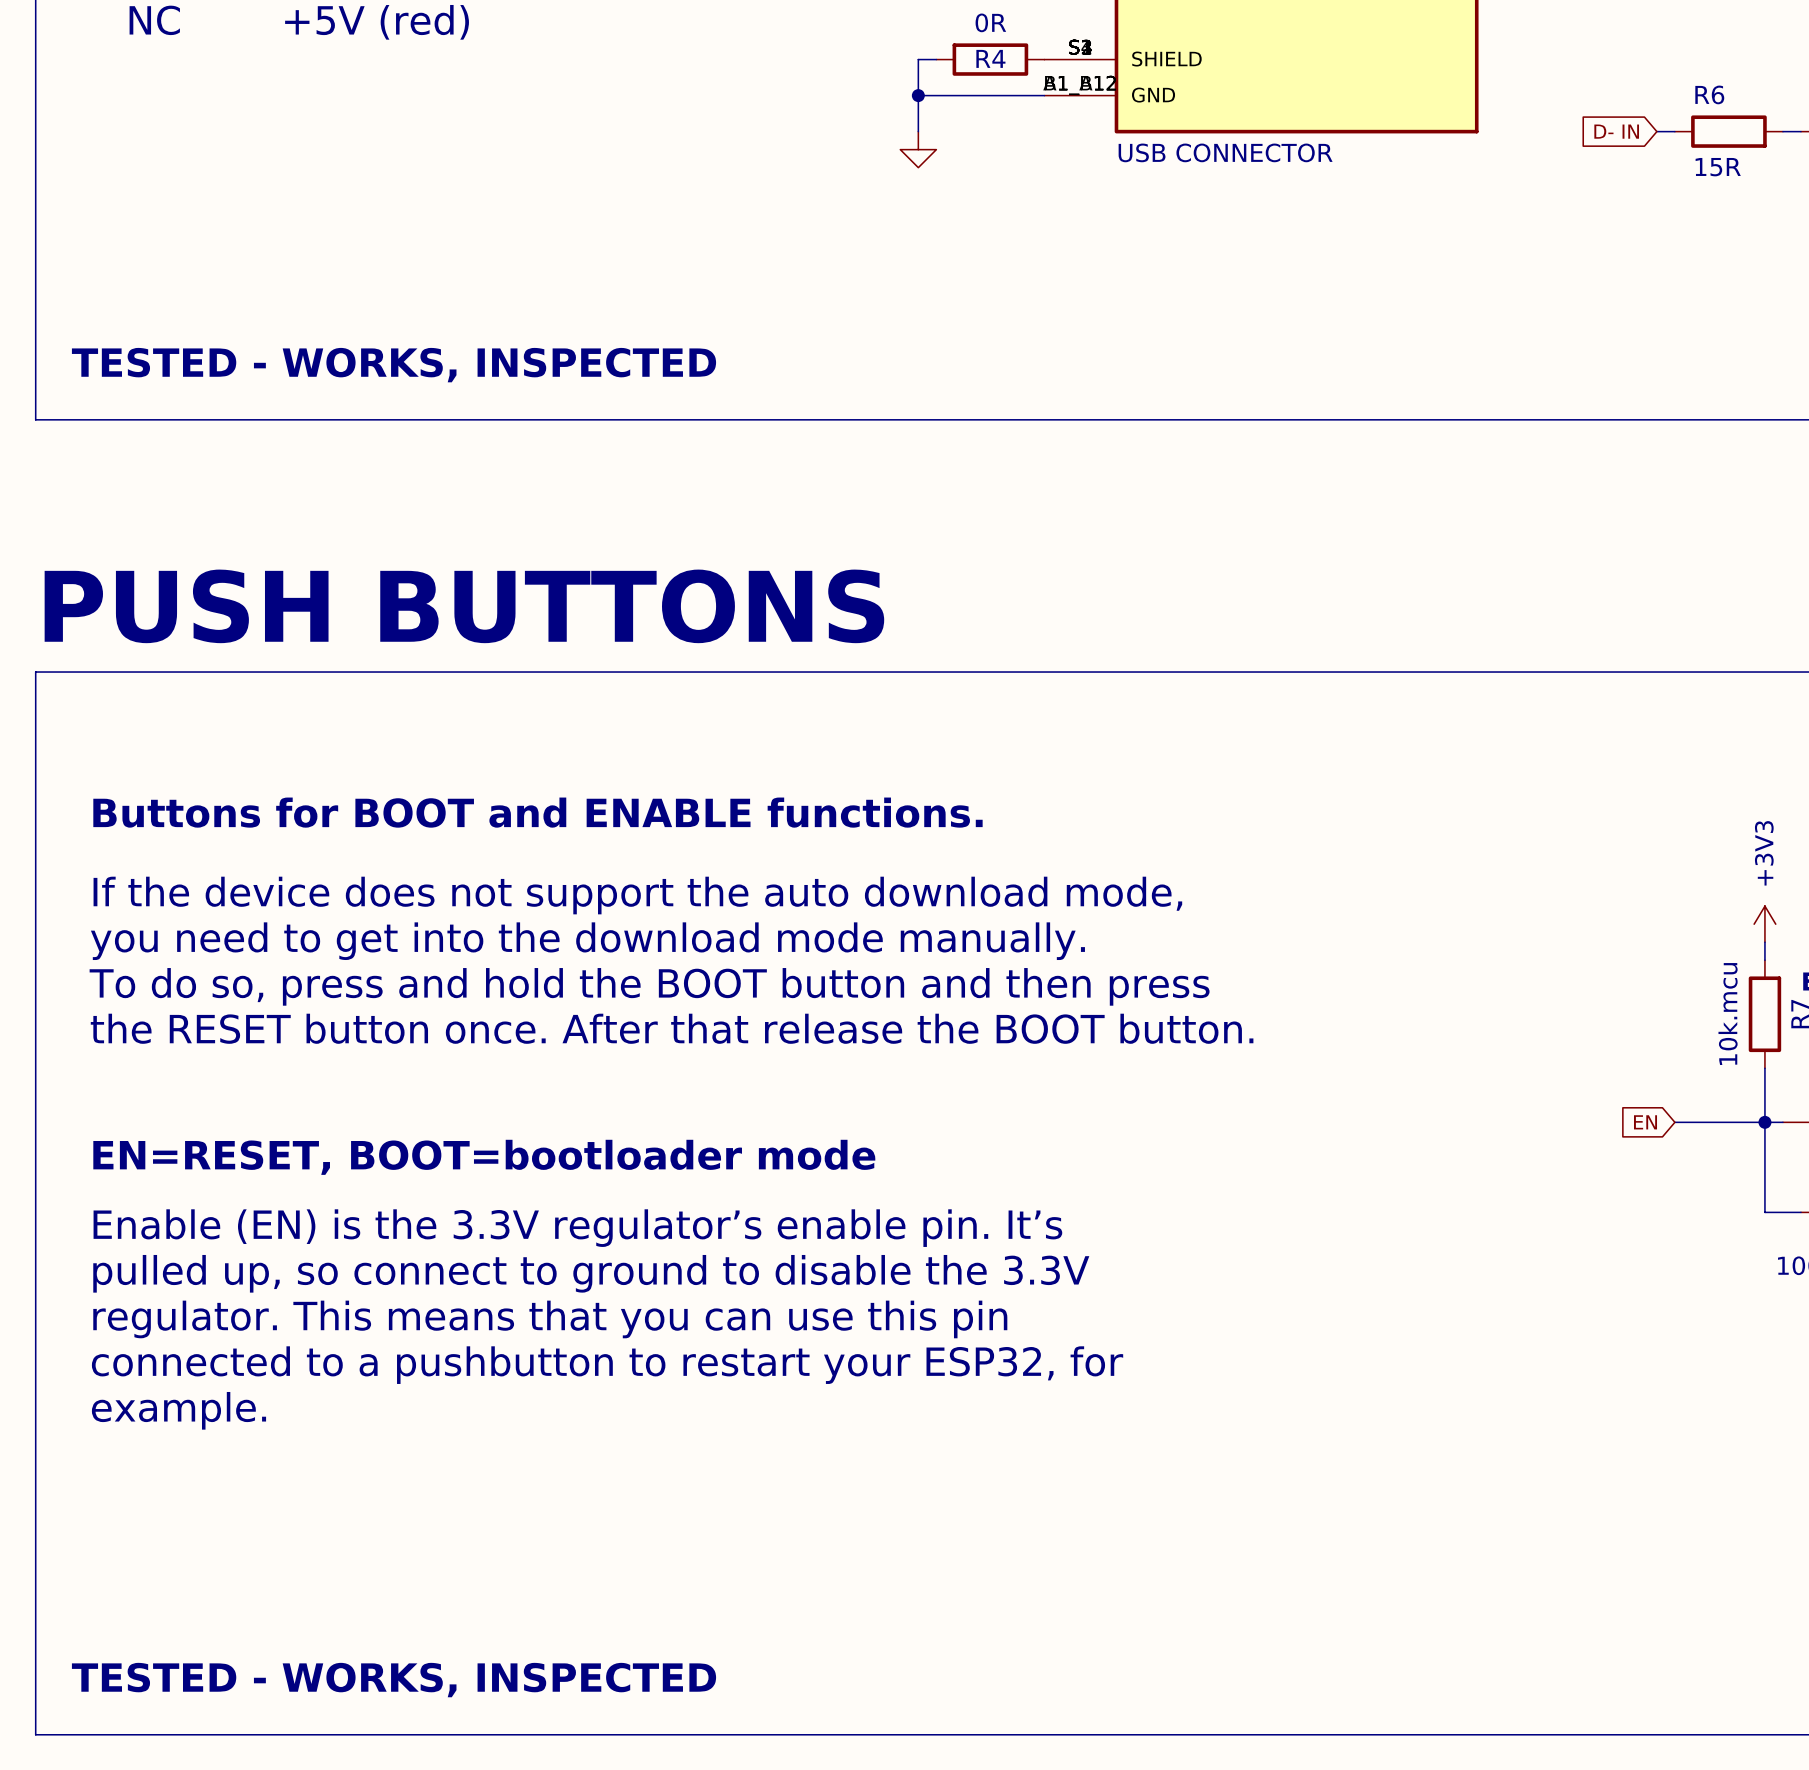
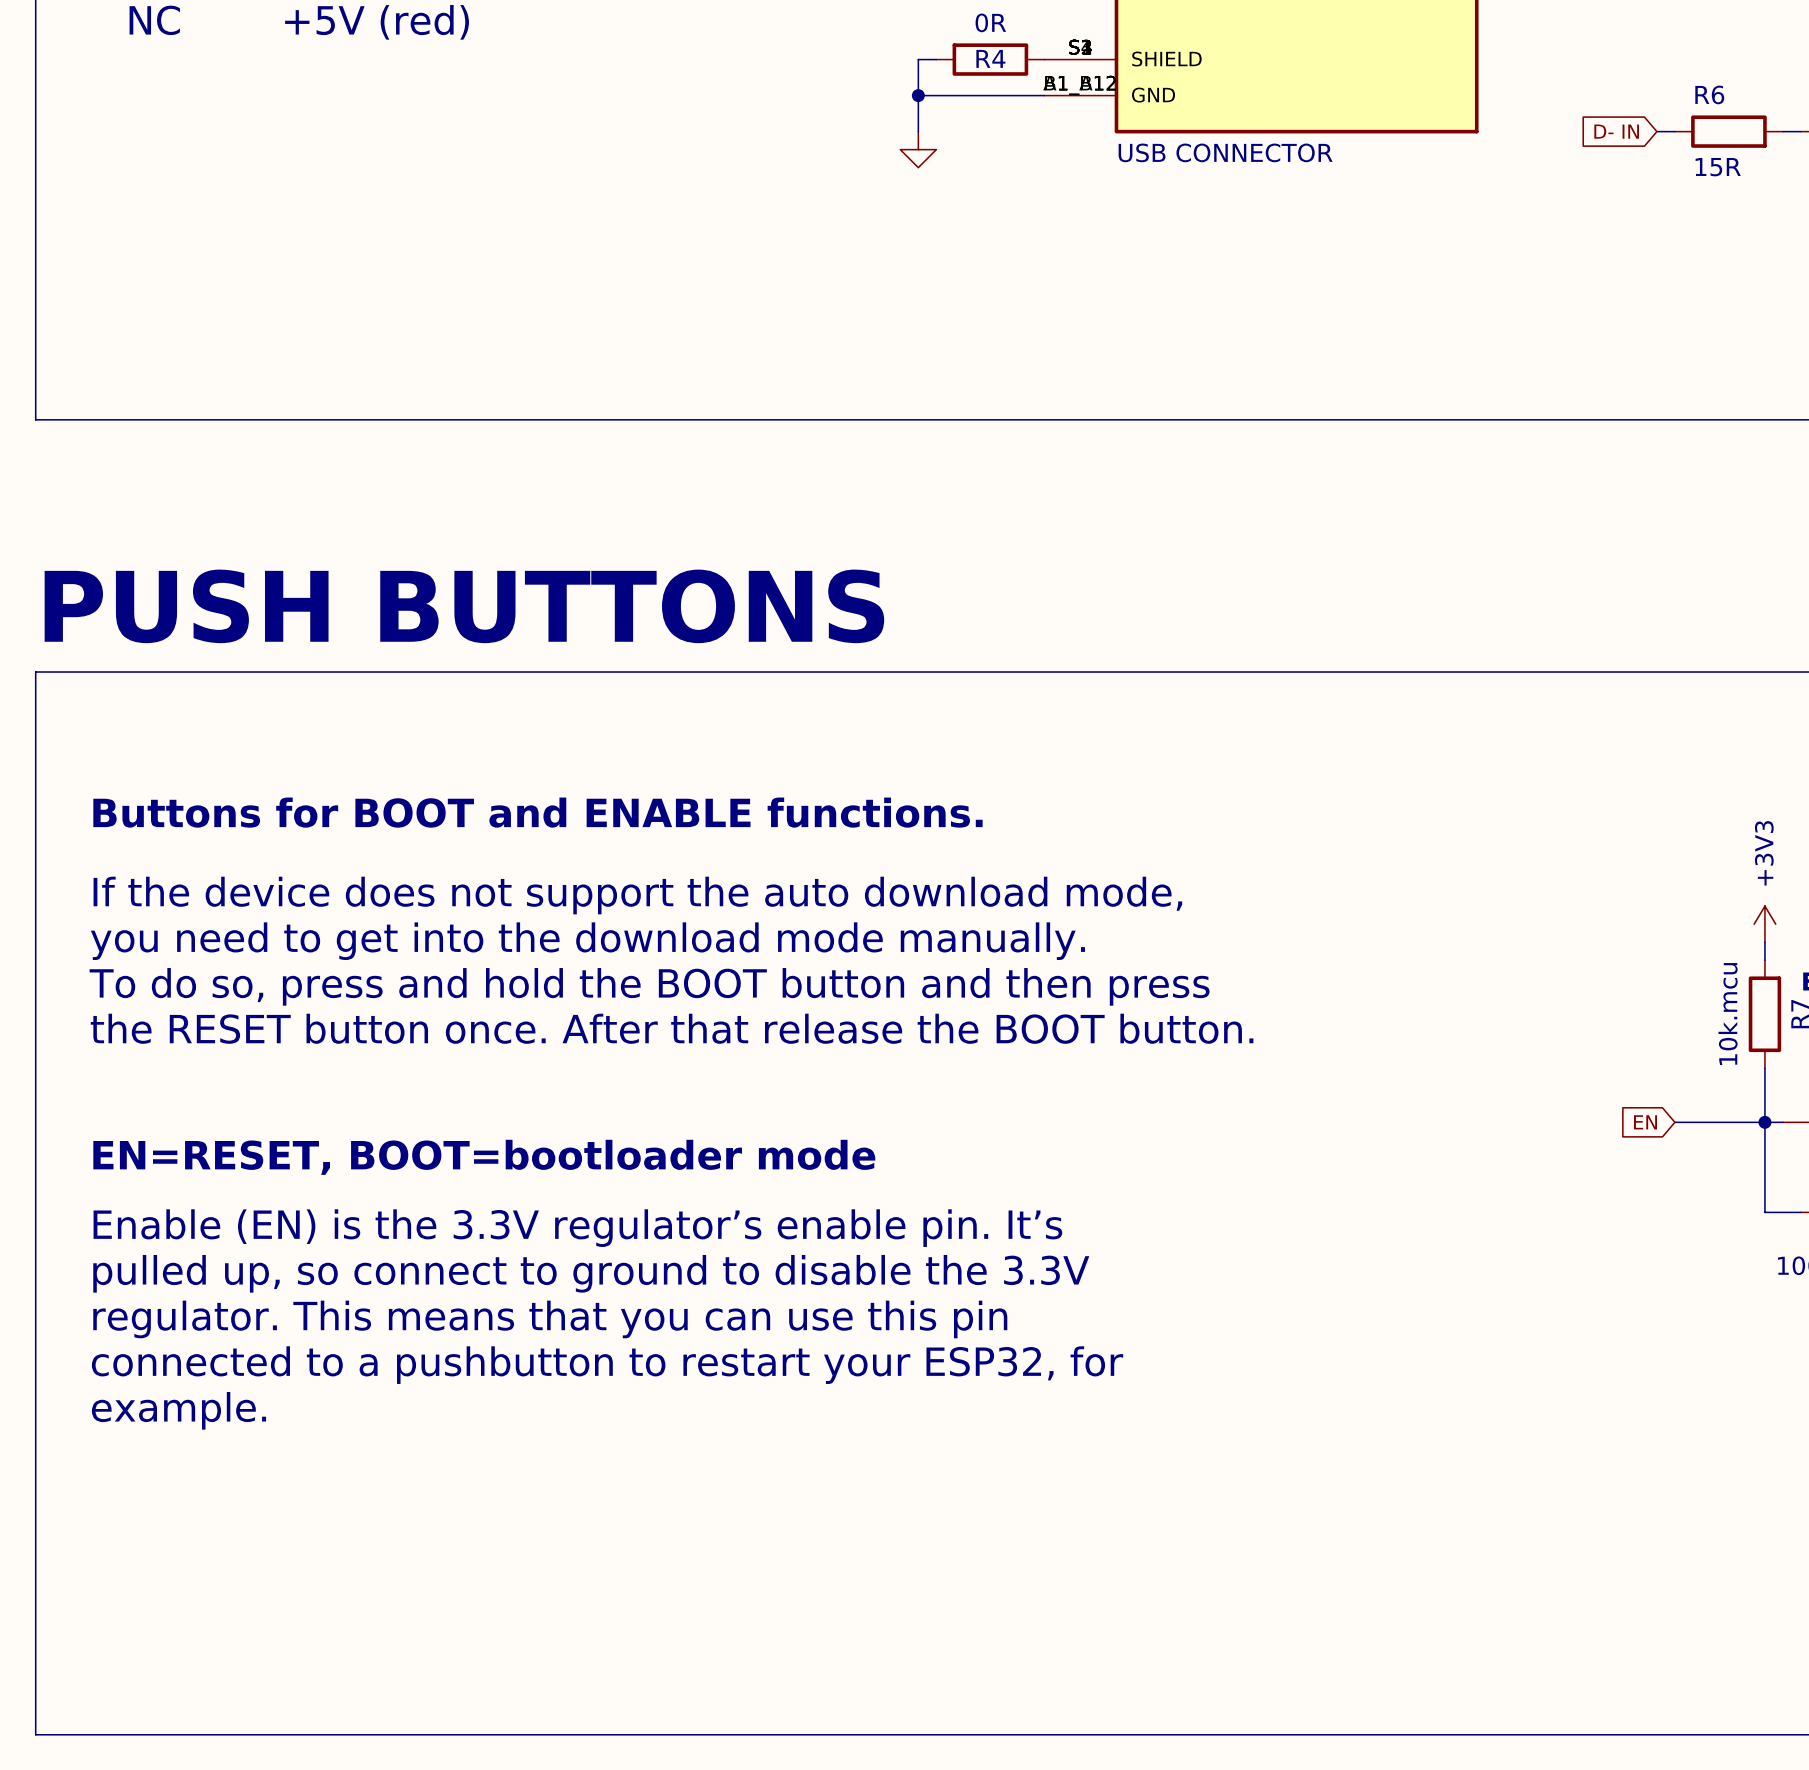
text: TESTED - WORKS, INSPECTED (394, 365) -> none
text: TESTED - WORKS, INSPECTED (394, 1680) -> none

